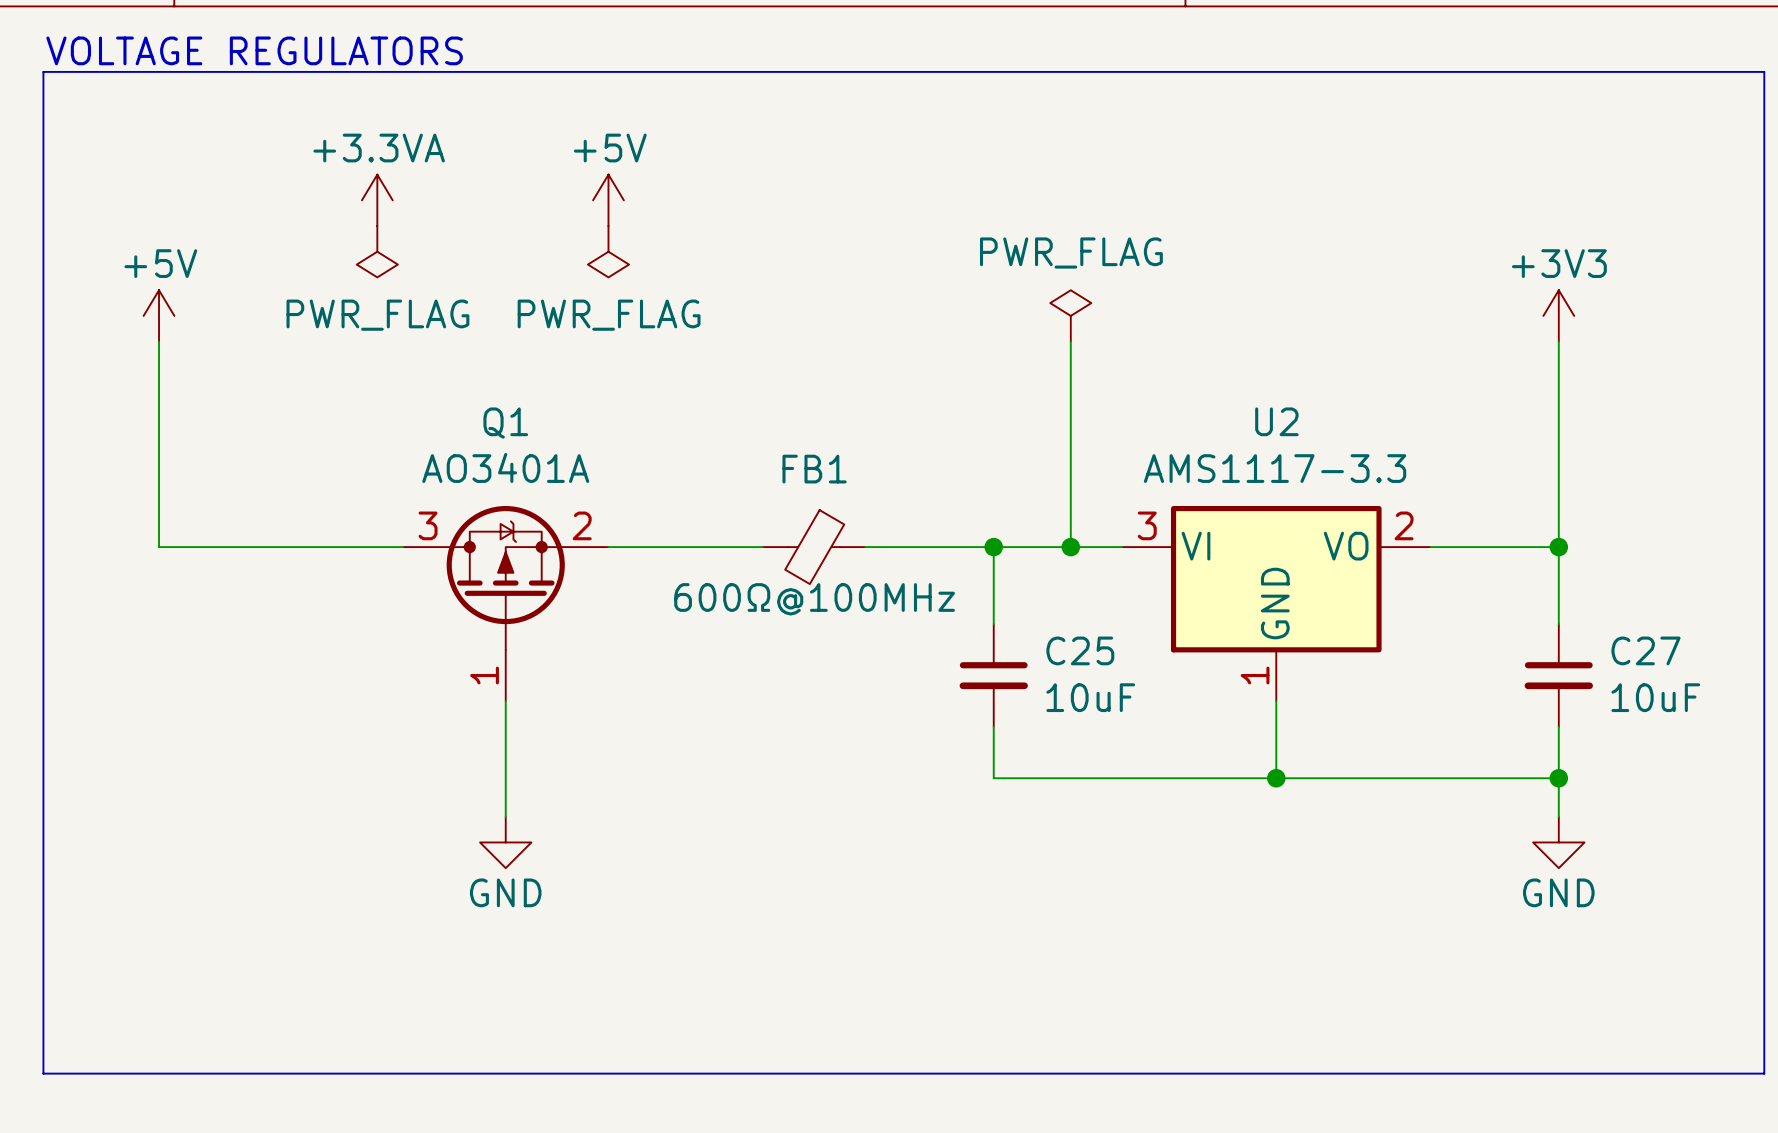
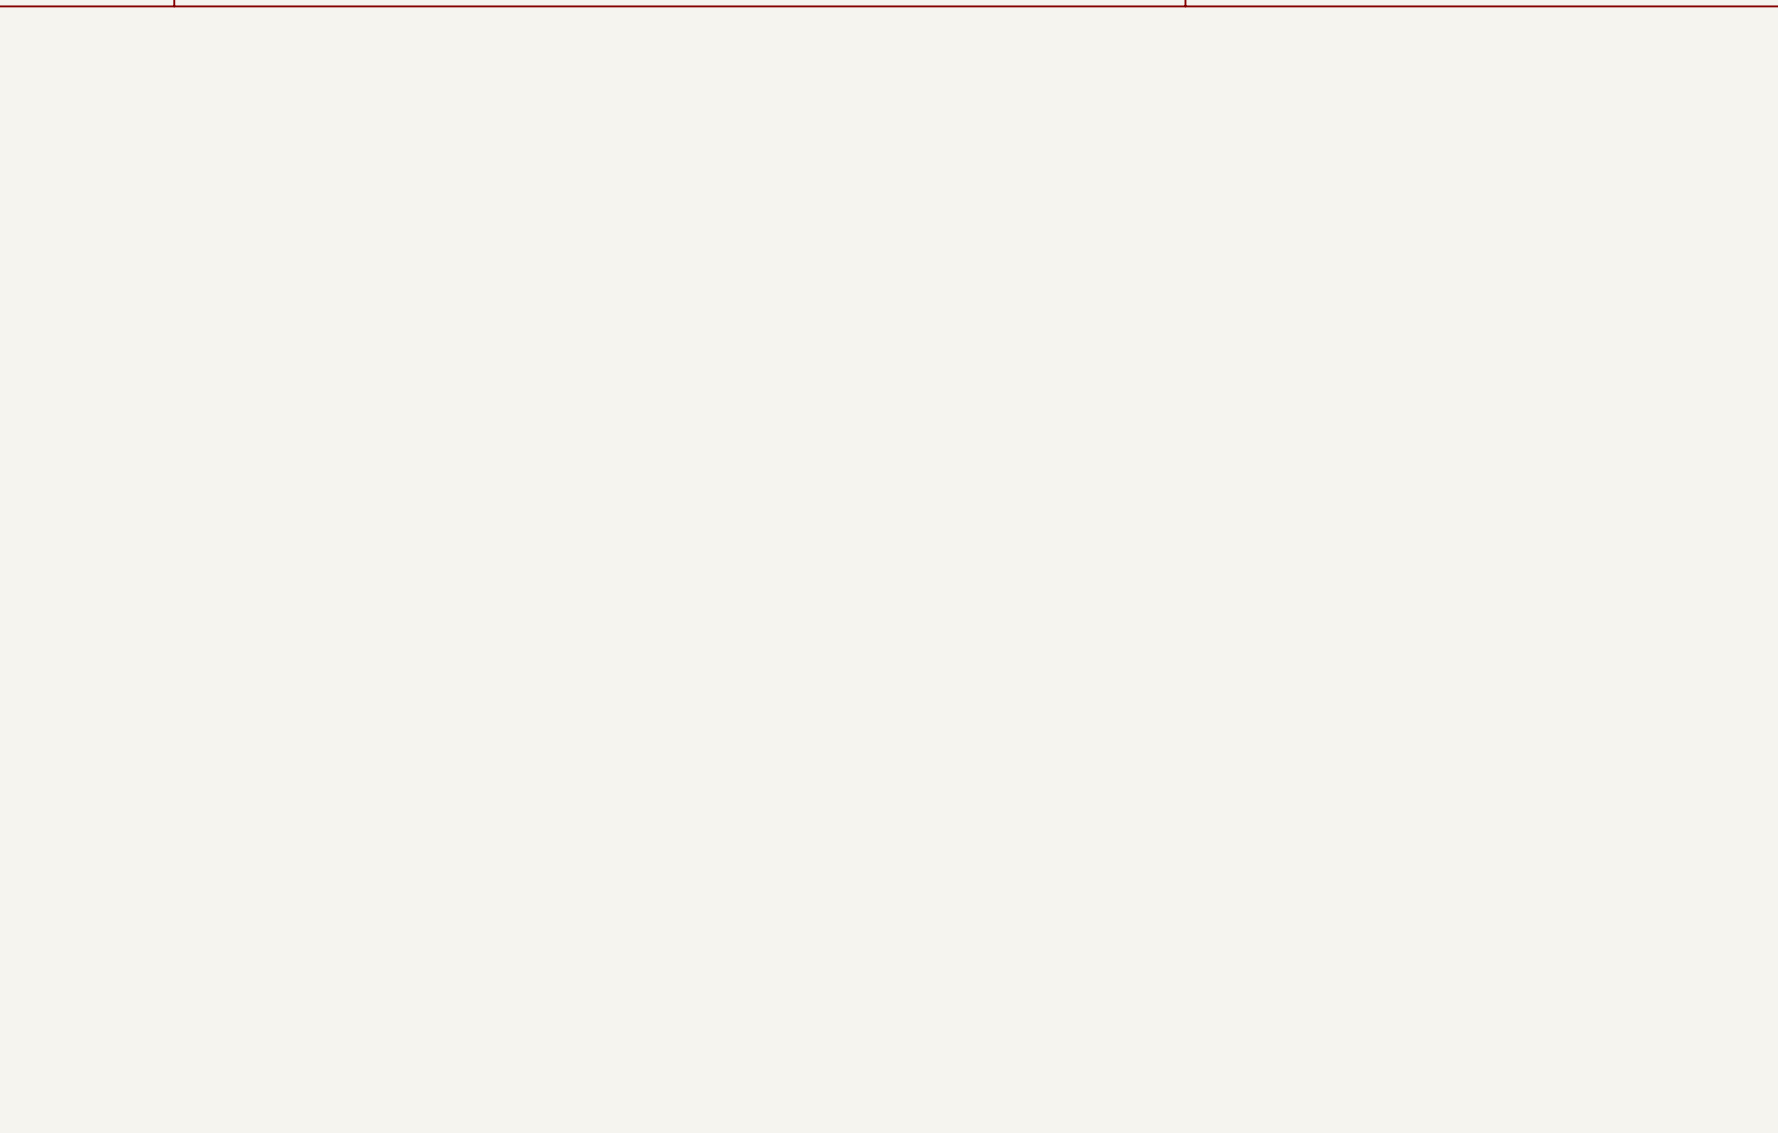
text: VOLTAGE REGULATORS (254, 50) -> none
line: (43, 71) (1764, 71) (1764, 1073) (43, 1073) (43, 71) -> none
power symbol: +3.3VA (377, 200) -> none
power symbol: +5V (608, 200) -> none
power symbol: PWR_FLAG (377, 251) -> none
power symbol: PWR_FLAG (608, 251) -> none
power symbol: +5V (159, 315) -> none
power symbol: PWR_FLAG (1070, 315) -> none
power symbol: +3V3 (1558, 315) -> none
wire: (159, 341) (159, 547) (403, 547) -> none
wire: (1070, 341) (1070, 547) -> none
wire: (1558, 341) (1558, 624) -> none
wire: (608, 547) (762, 547) -> none
FB1: 600Ω@100MHz (813, 547) -> none
wire: (865, 547) (1122, 547) -> none
wire: (993, 547) (993, 624) -> none
junction: (993, 547) -> none
junction: (1070, 547) -> none
wire: (1430, 547) (1558, 547) -> none
junction: (1558, 547) -> none
Q1: AO3401A (505, 603) -> none
U2: AMS1117-3.3 (1276, 603) -> none
C25: 10uF (993, 675) -> none
C27: 10uF (1558, 675) -> none
wire: (505, 701) (505, 816) -> none
wire: (1276, 701) (1276, 778) -> none
wire: (993, 726) (993, 778) (1558, 778) -> none
wire: (1558, 726) (1558, 816) -> none
junction: (1276, 778) -> none
junction: (1558, 778) -> none
power symbol: GND (505, 842) -> none
power symbol: GND (1558, 842) -> none

